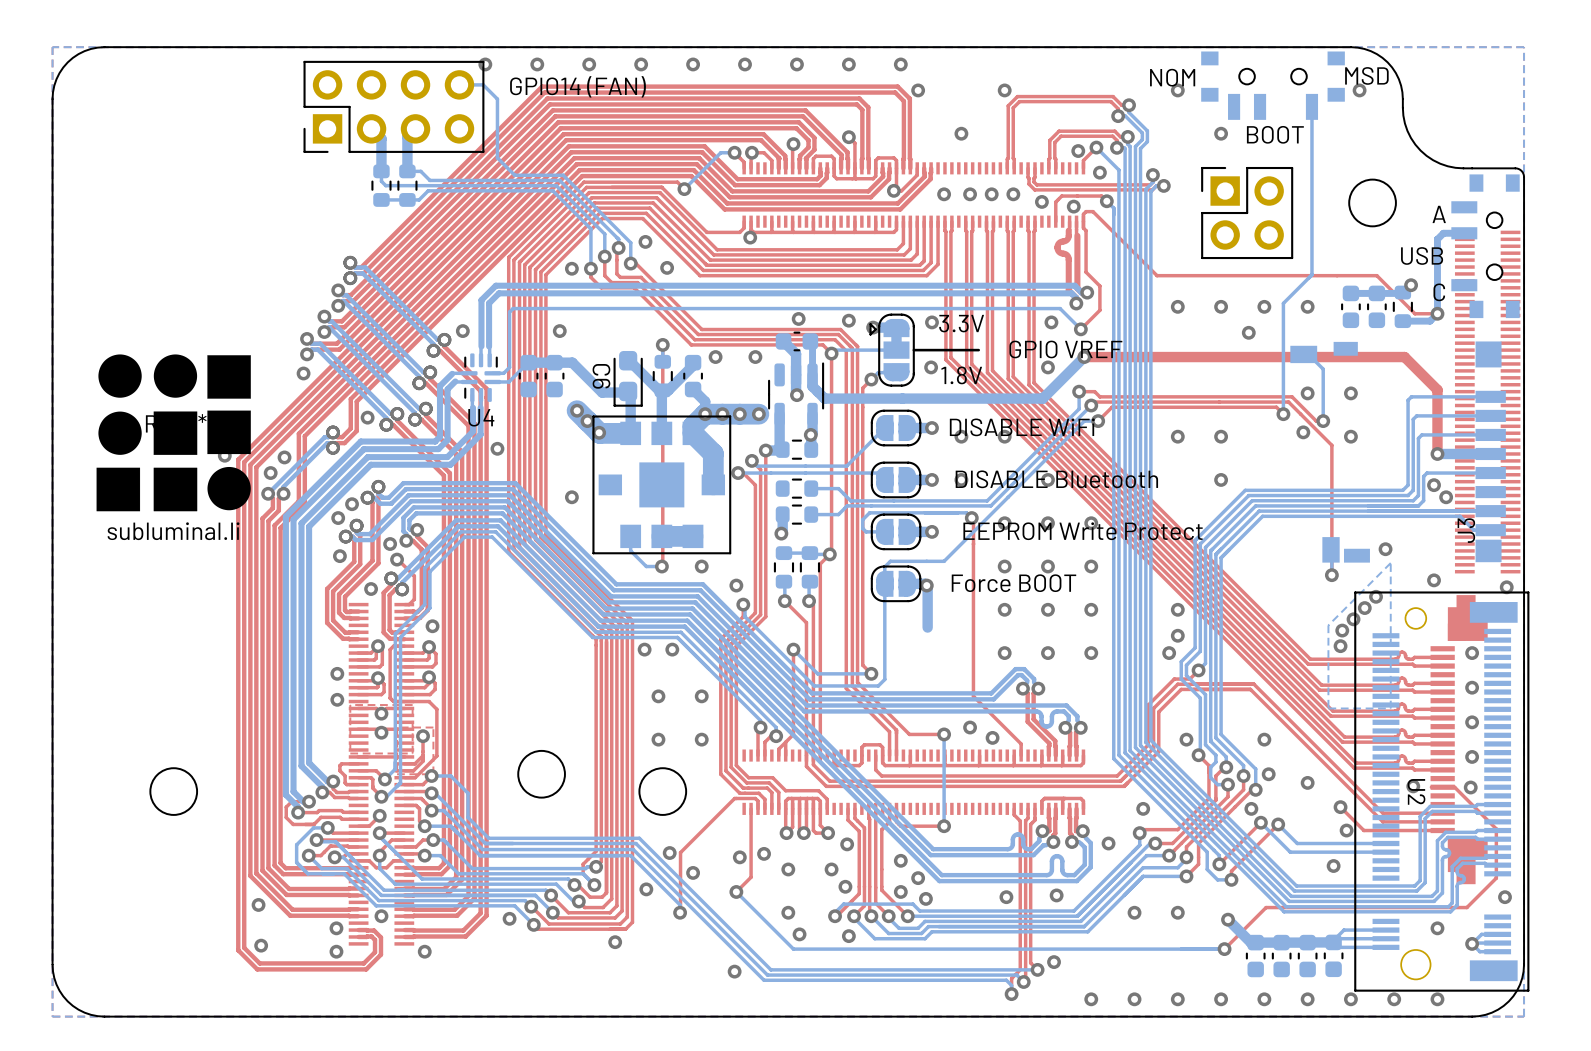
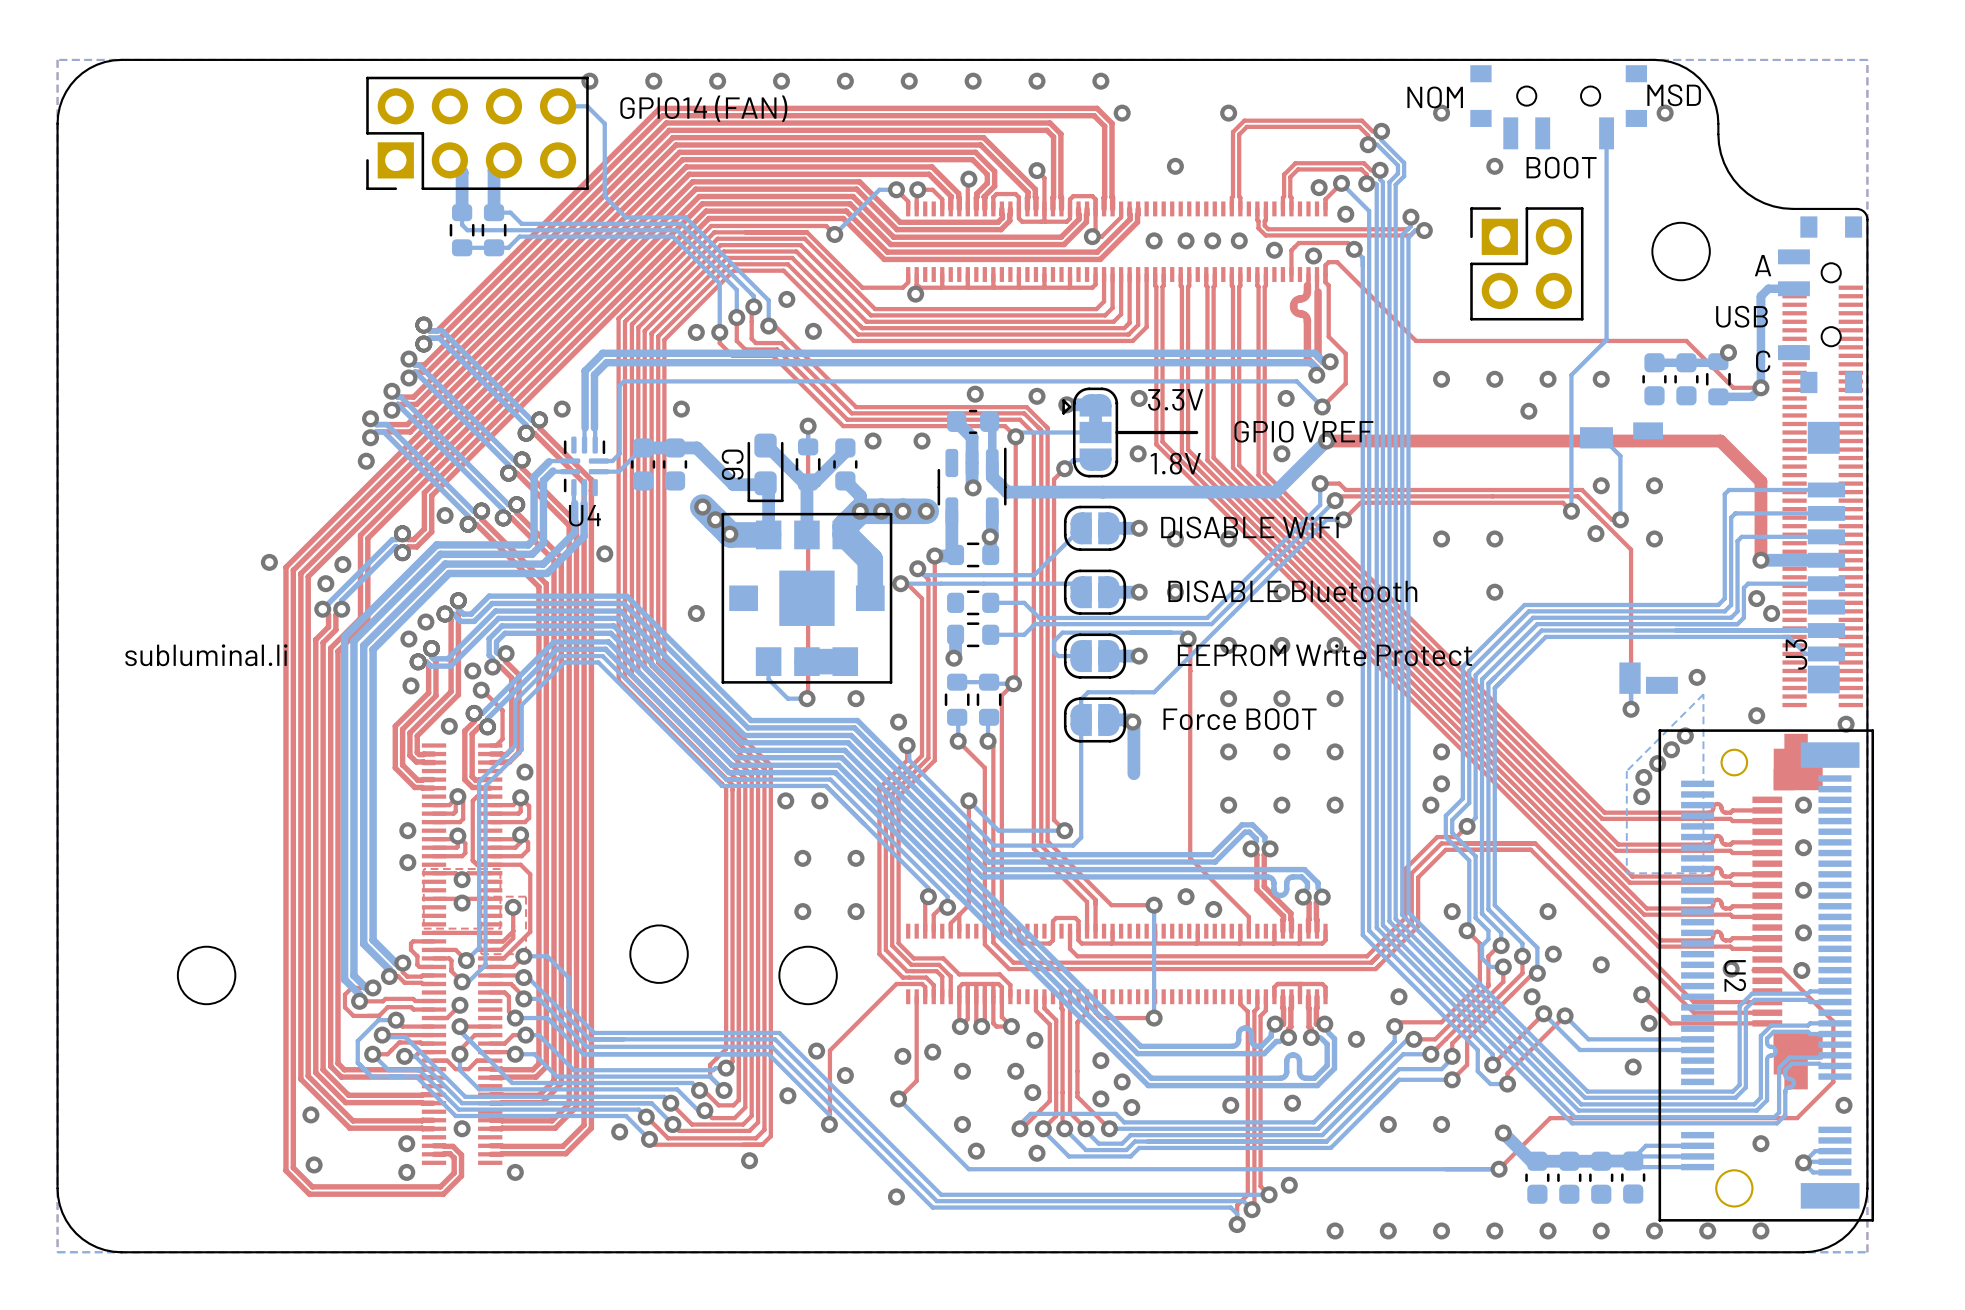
part: (173, 432) -> none

